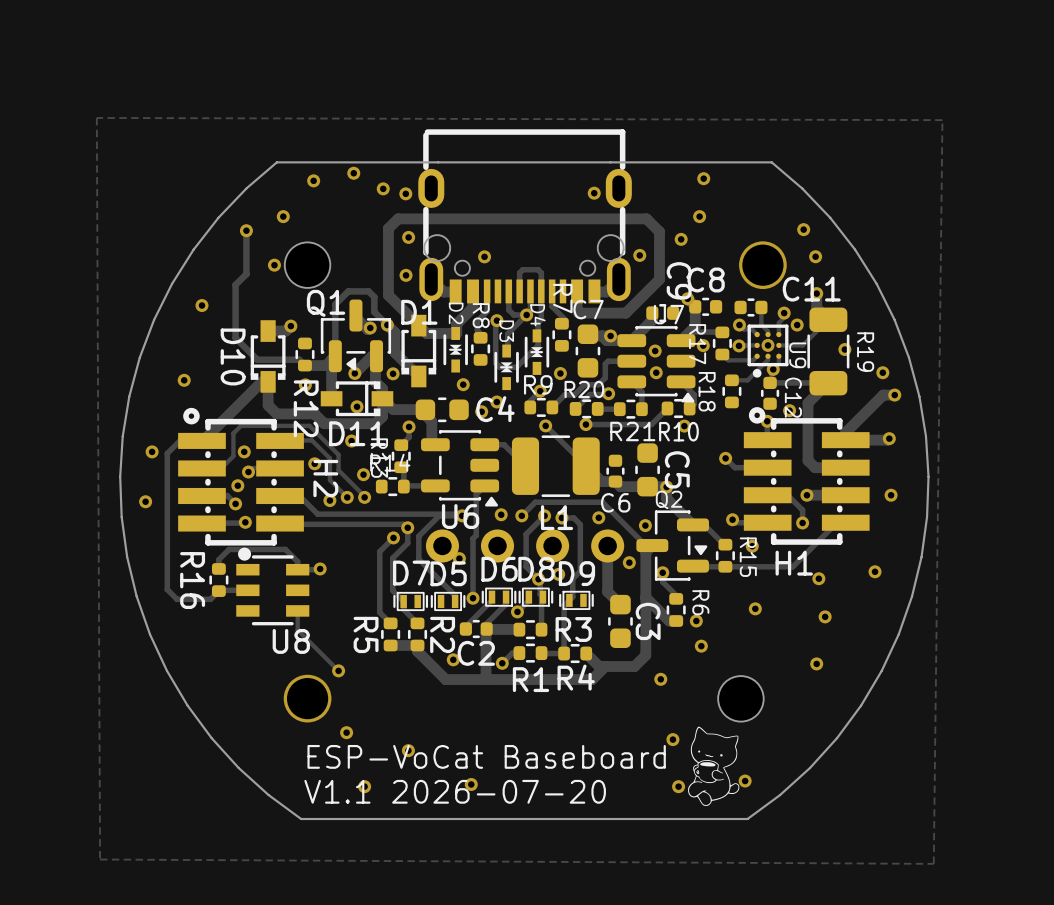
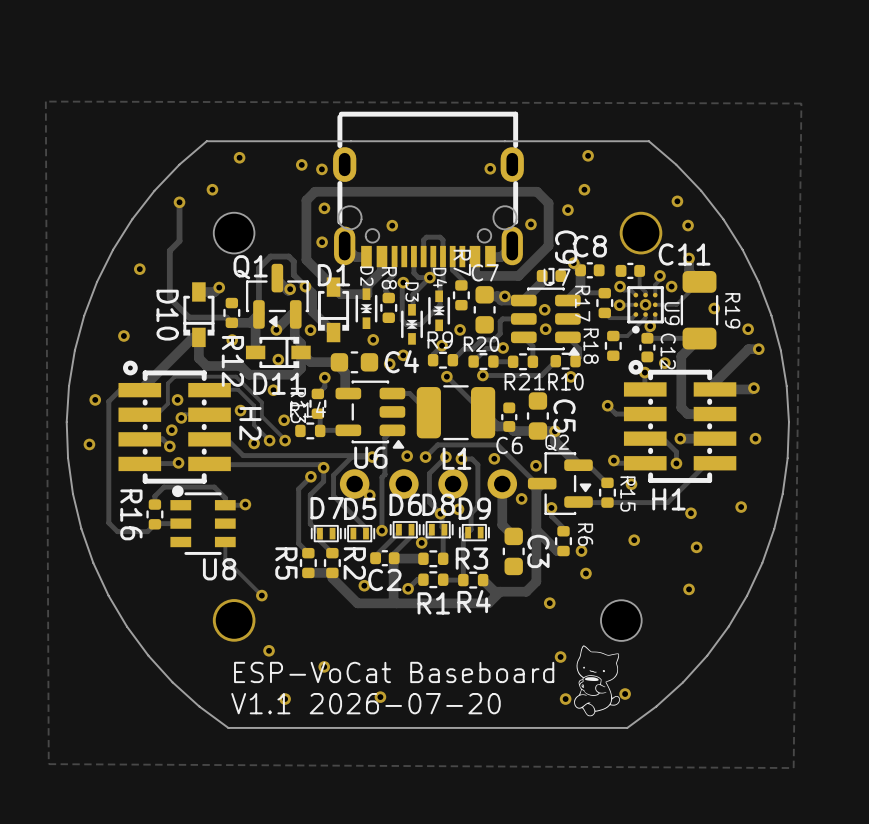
via: (353, 173) -> none
via: (274, 265) -> none
via: (703, 345) -> none

